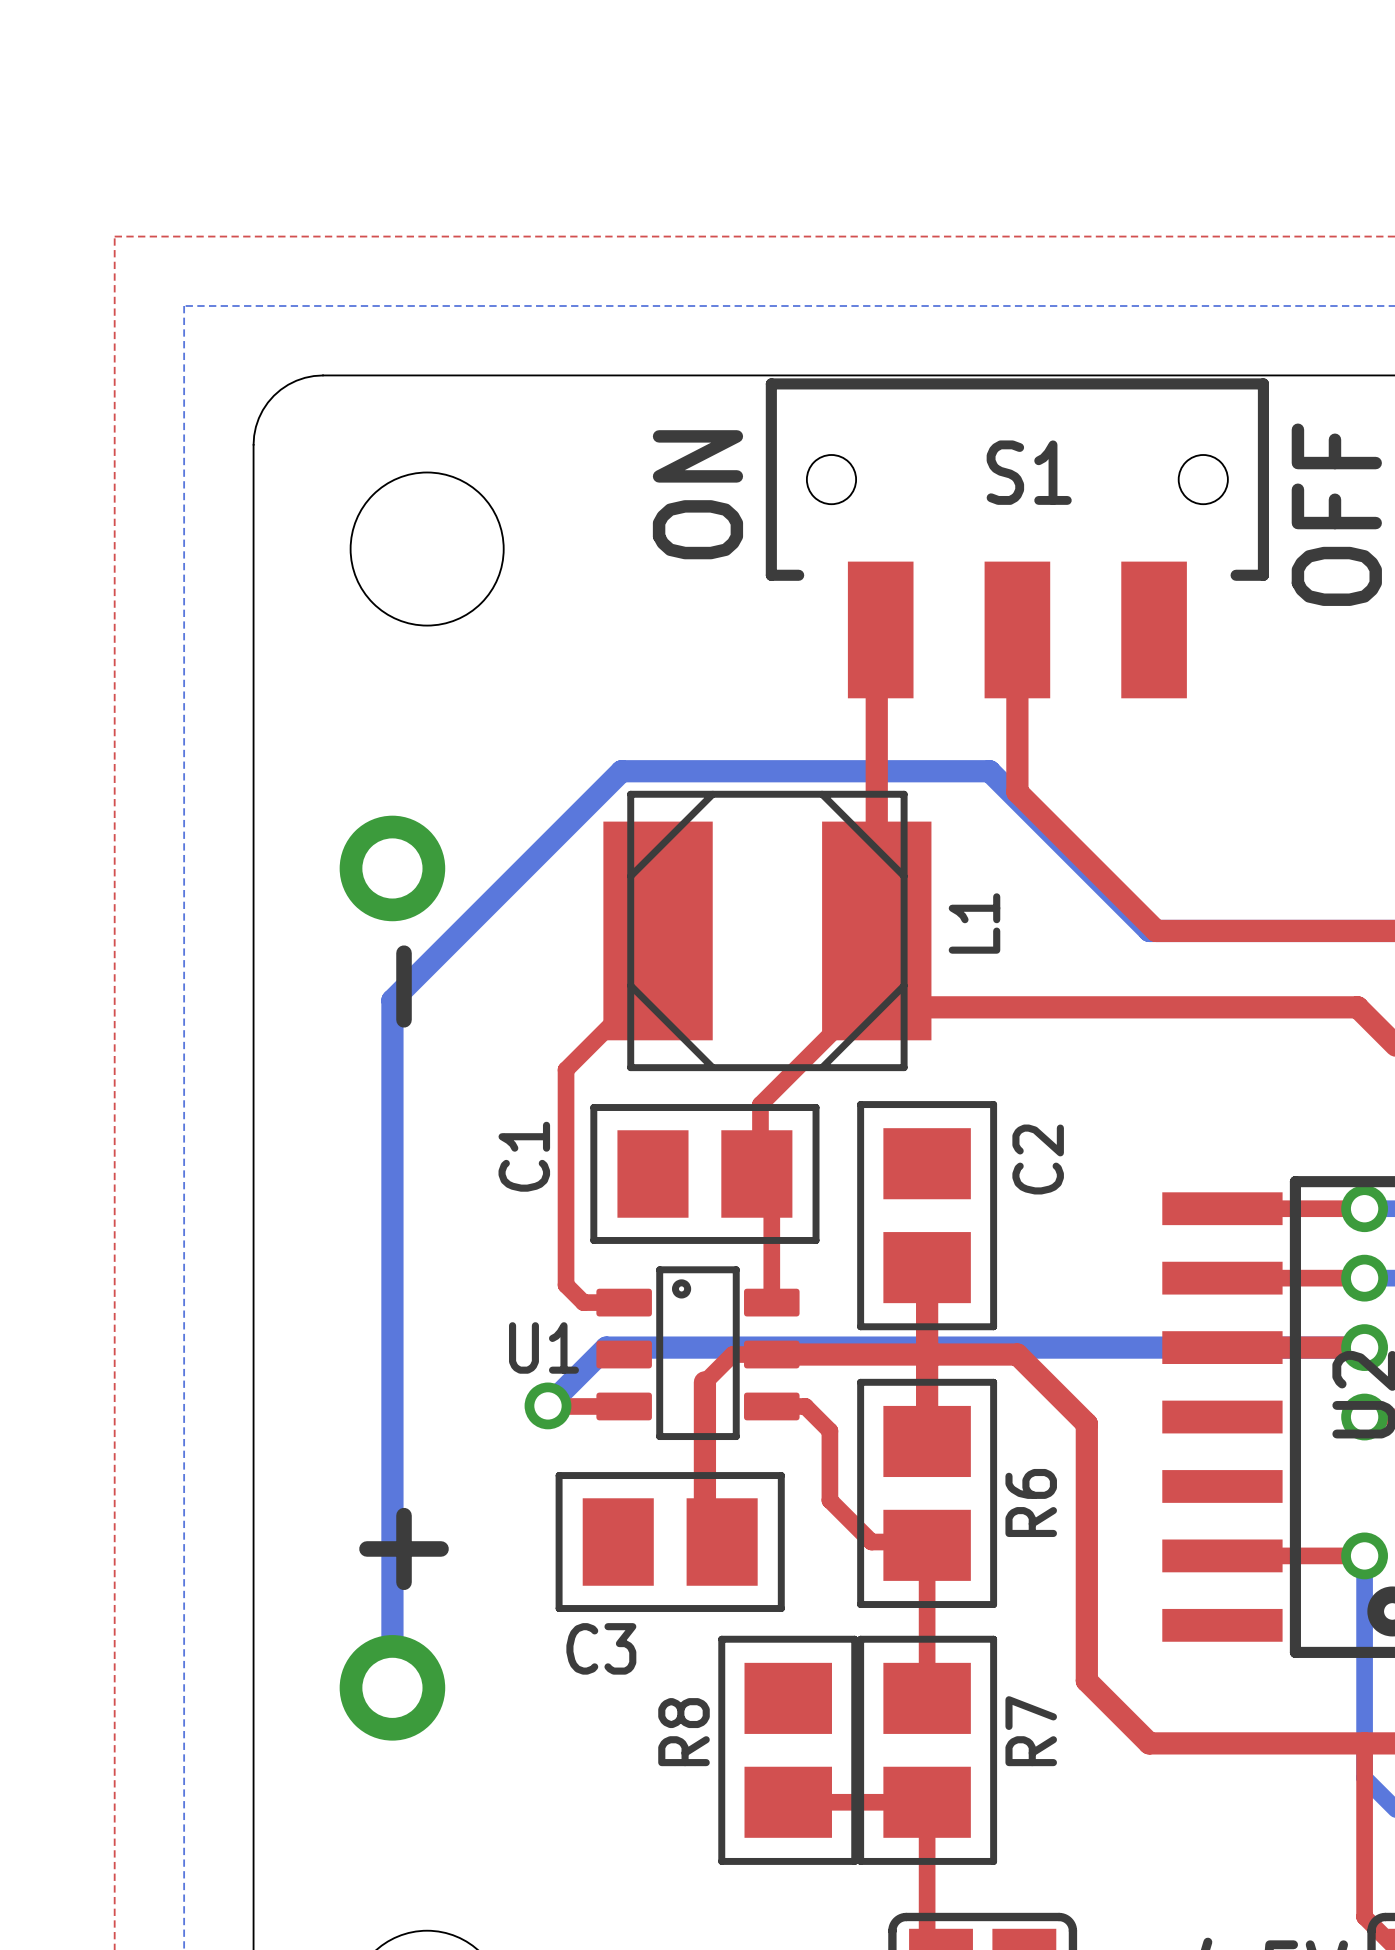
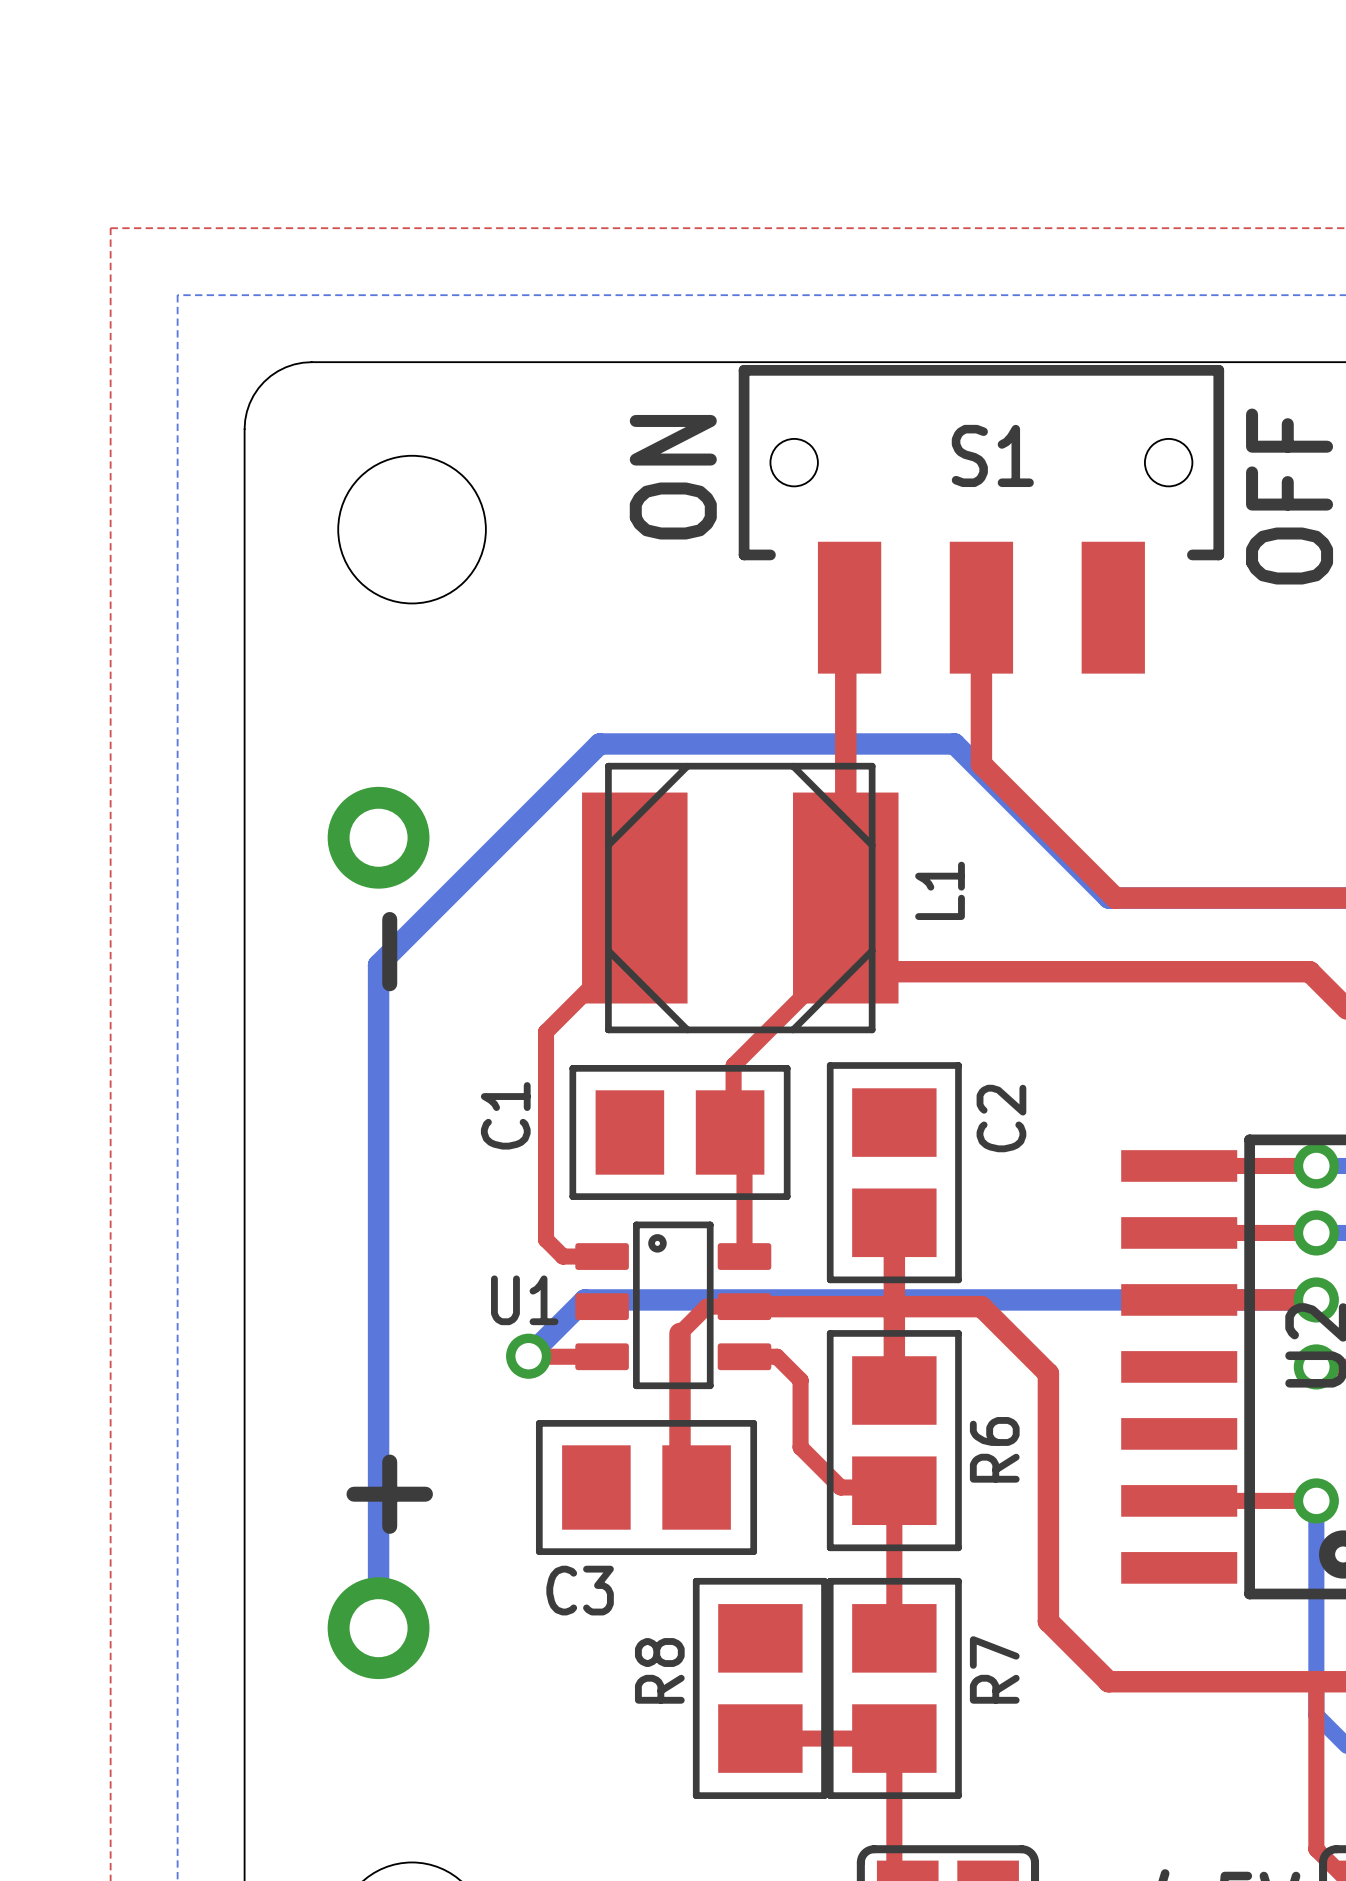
S1 footprint: [765, 378, 1269, 699] -> [738, 364, 1225, 674]

